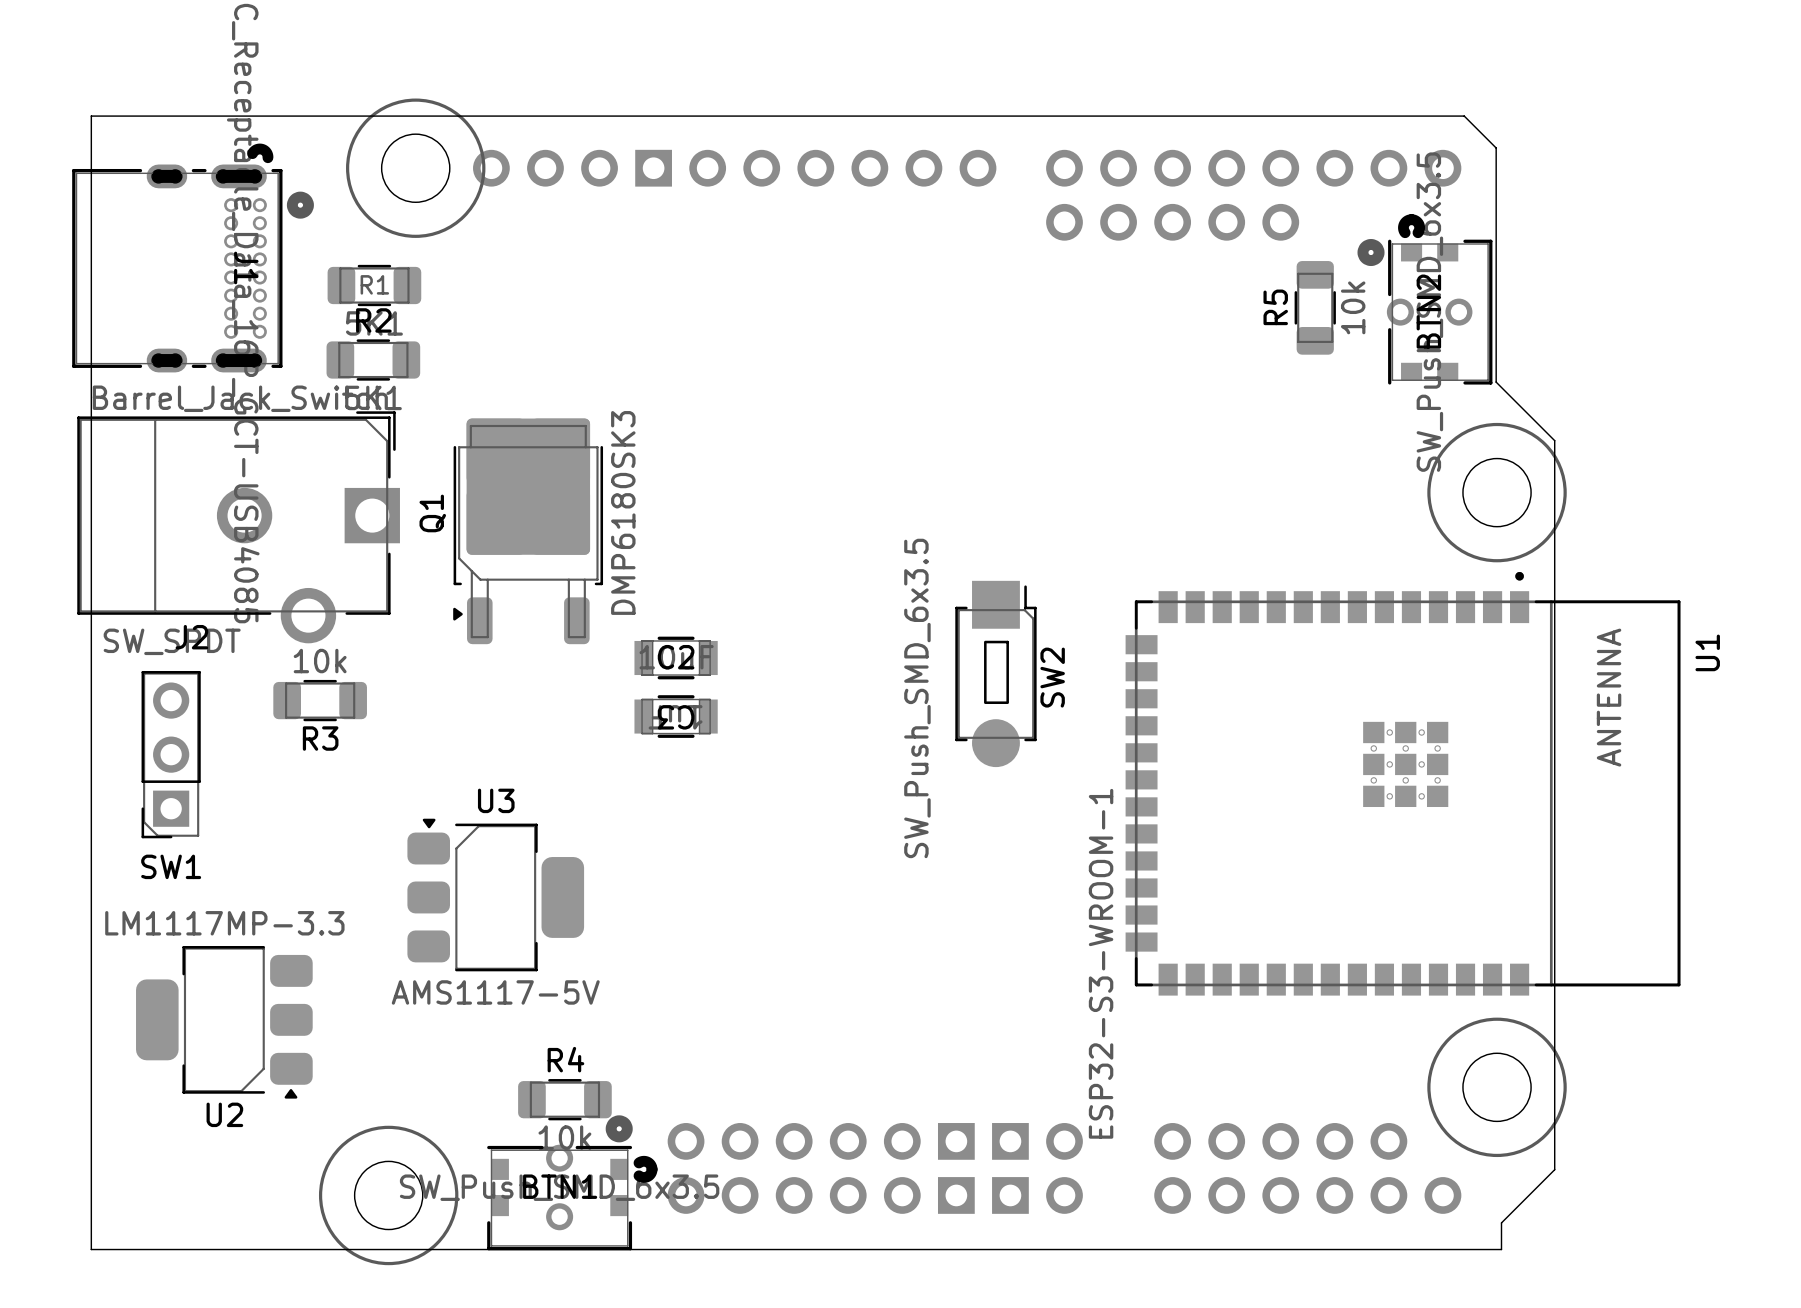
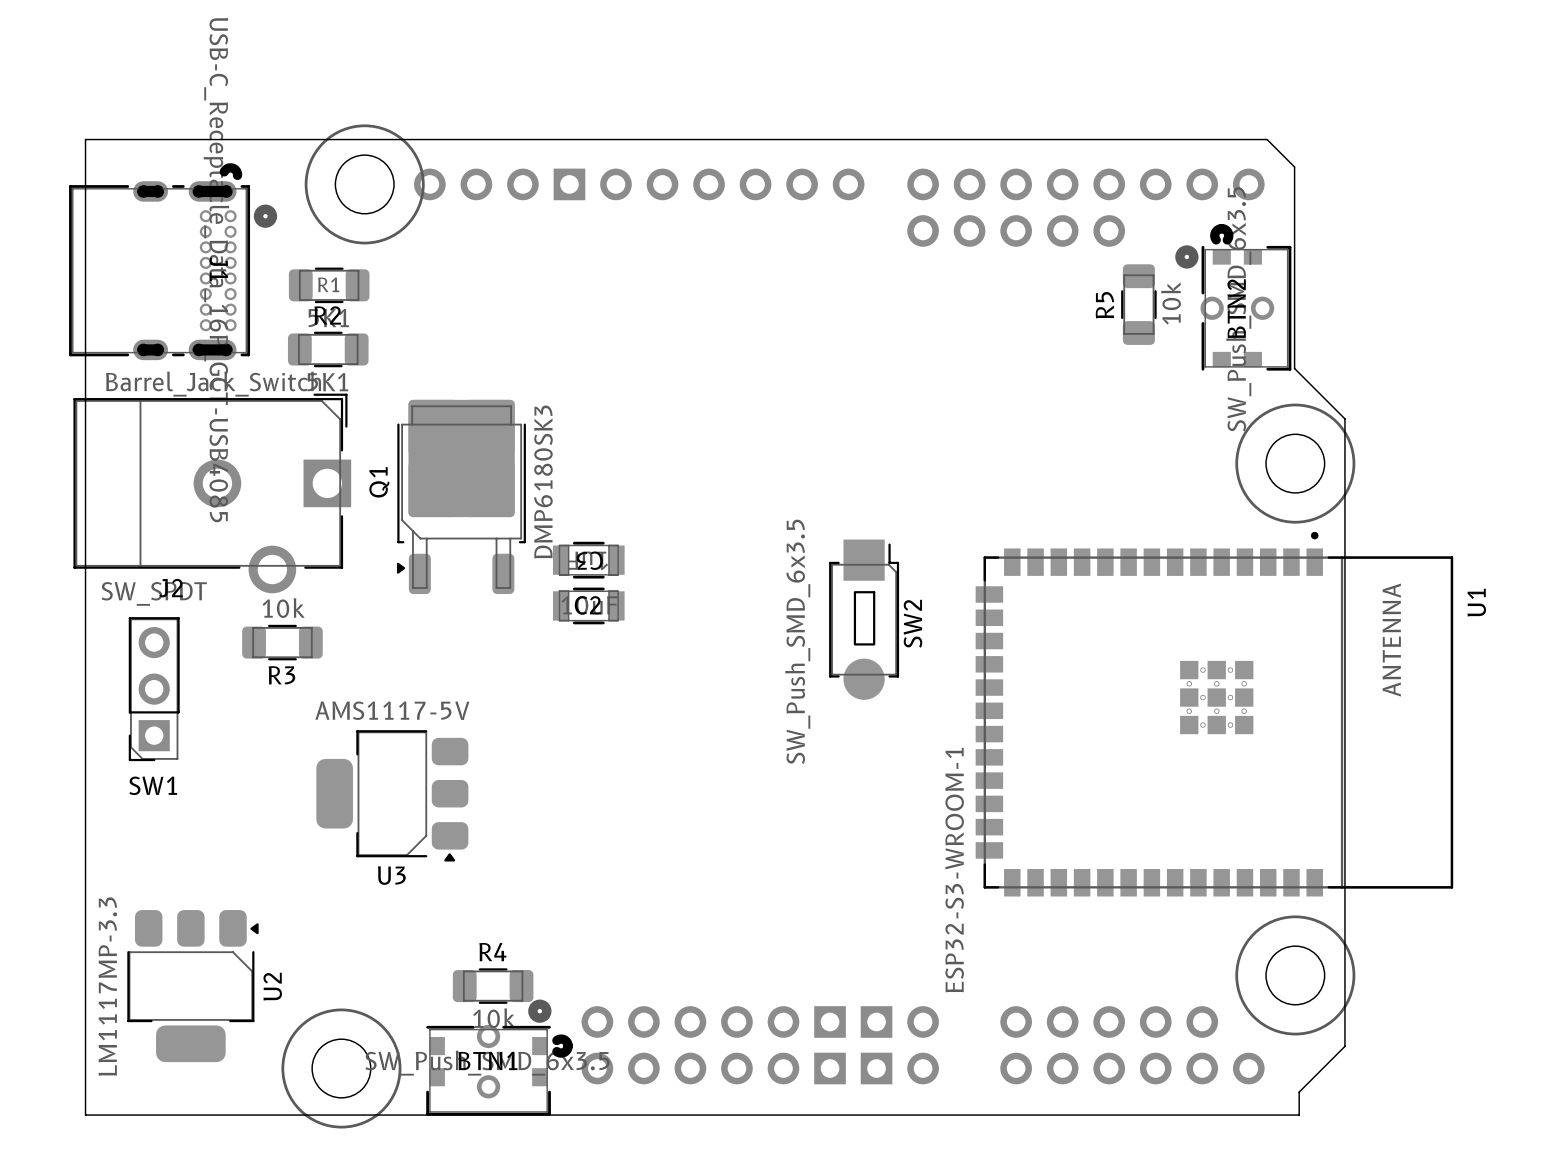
C3 position: (676, 716) -> (588, 560)
U3 rotation: 0° (495, 895) -> 180° (392, 795)
U2 rotation: 0° (224, 1022) -> 90° counterclockwise (192, 986)

